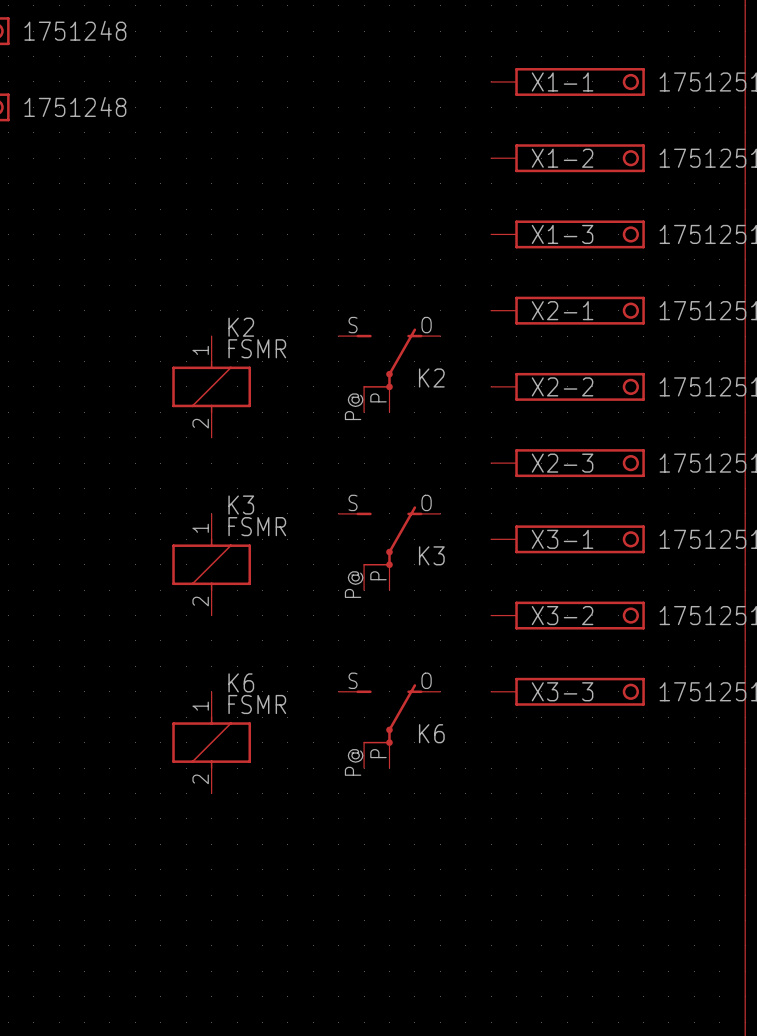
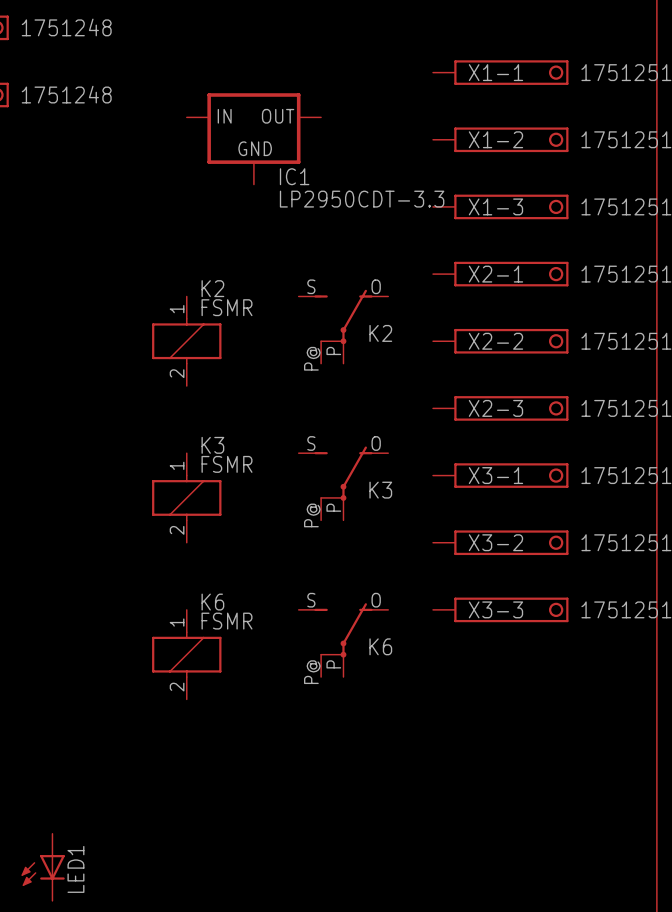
IC1: none -> LP2950CDT-3.3 (253, 138)
LED1: none -> (43, 867)

